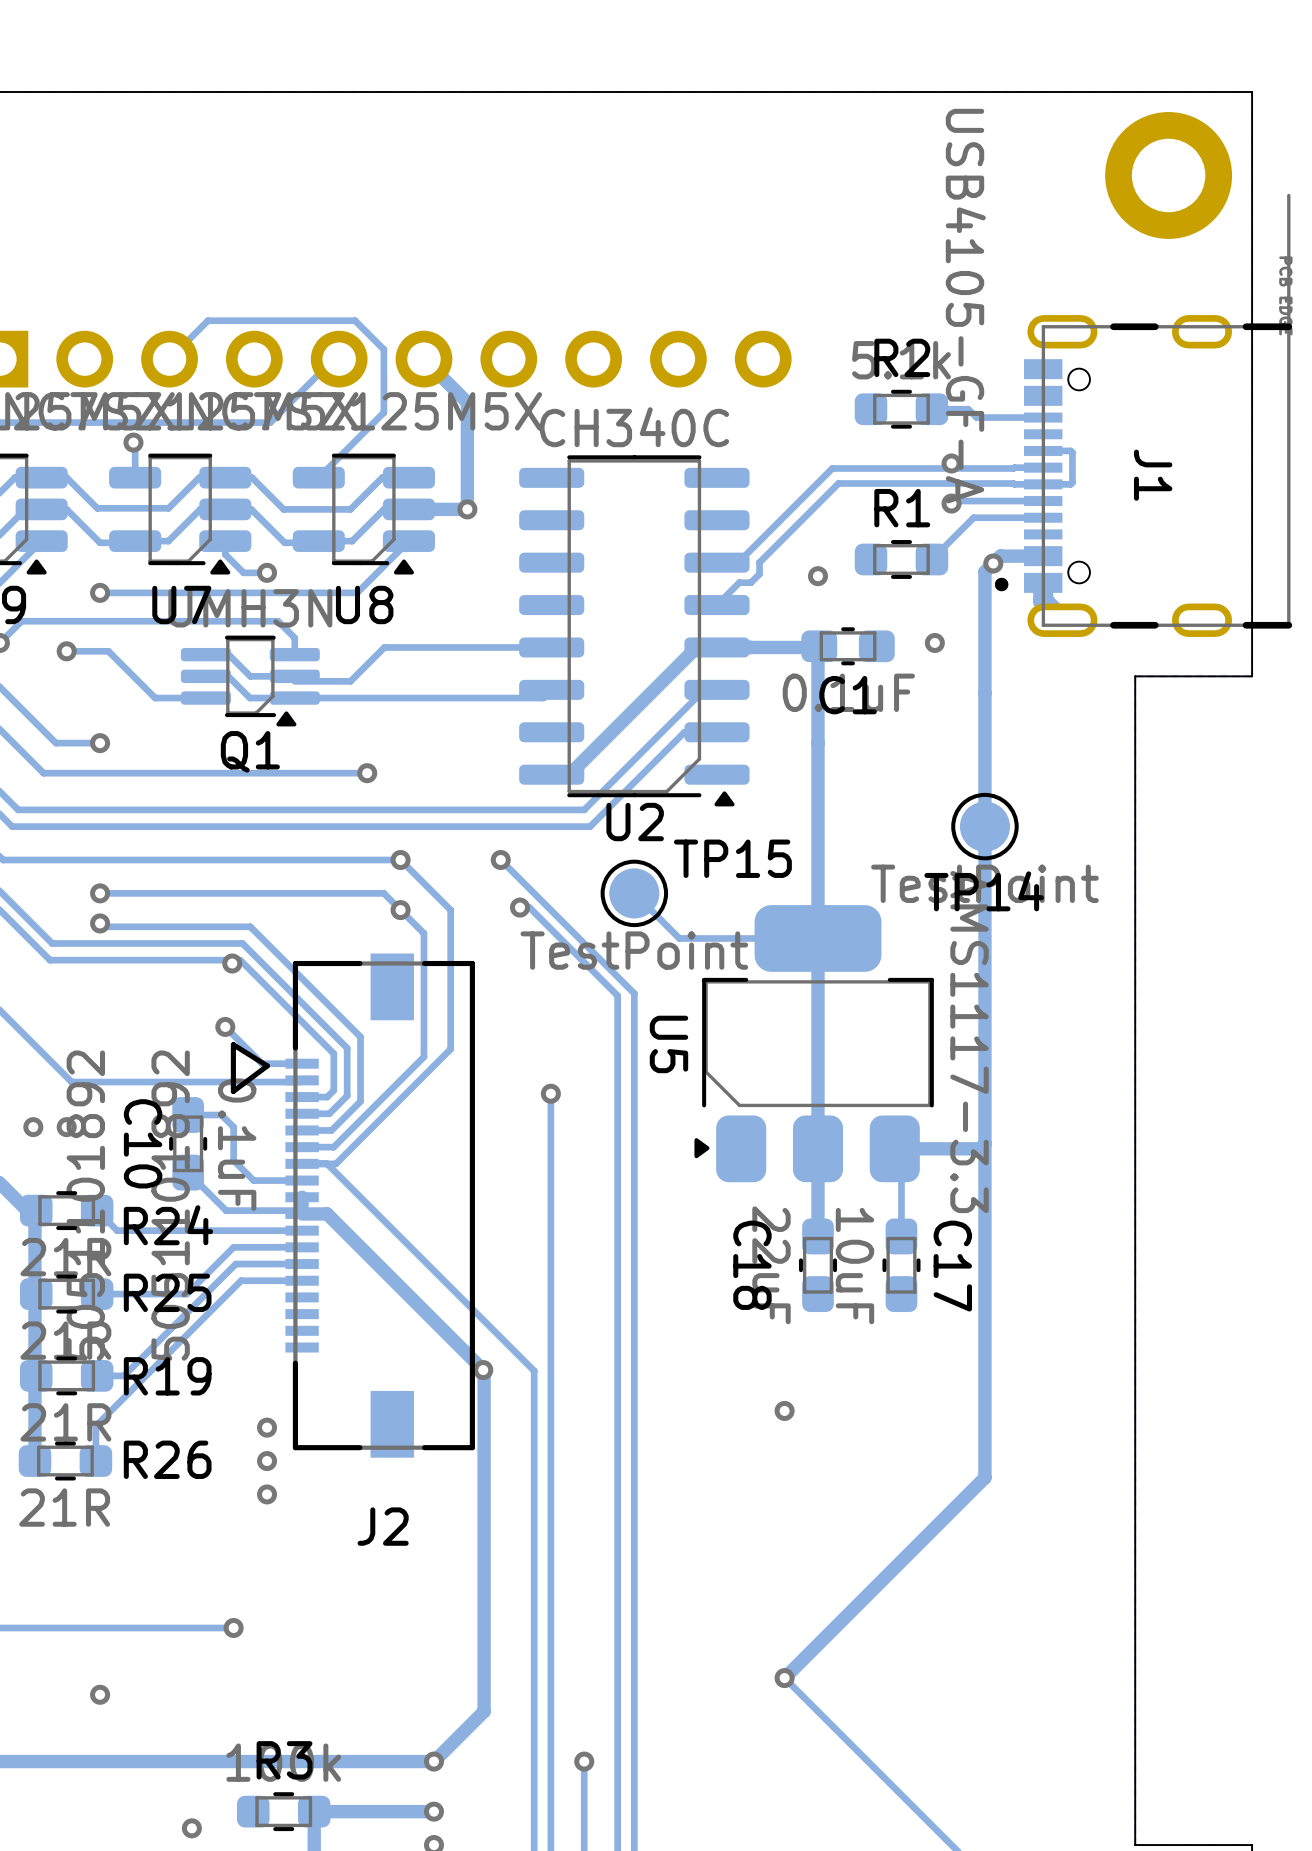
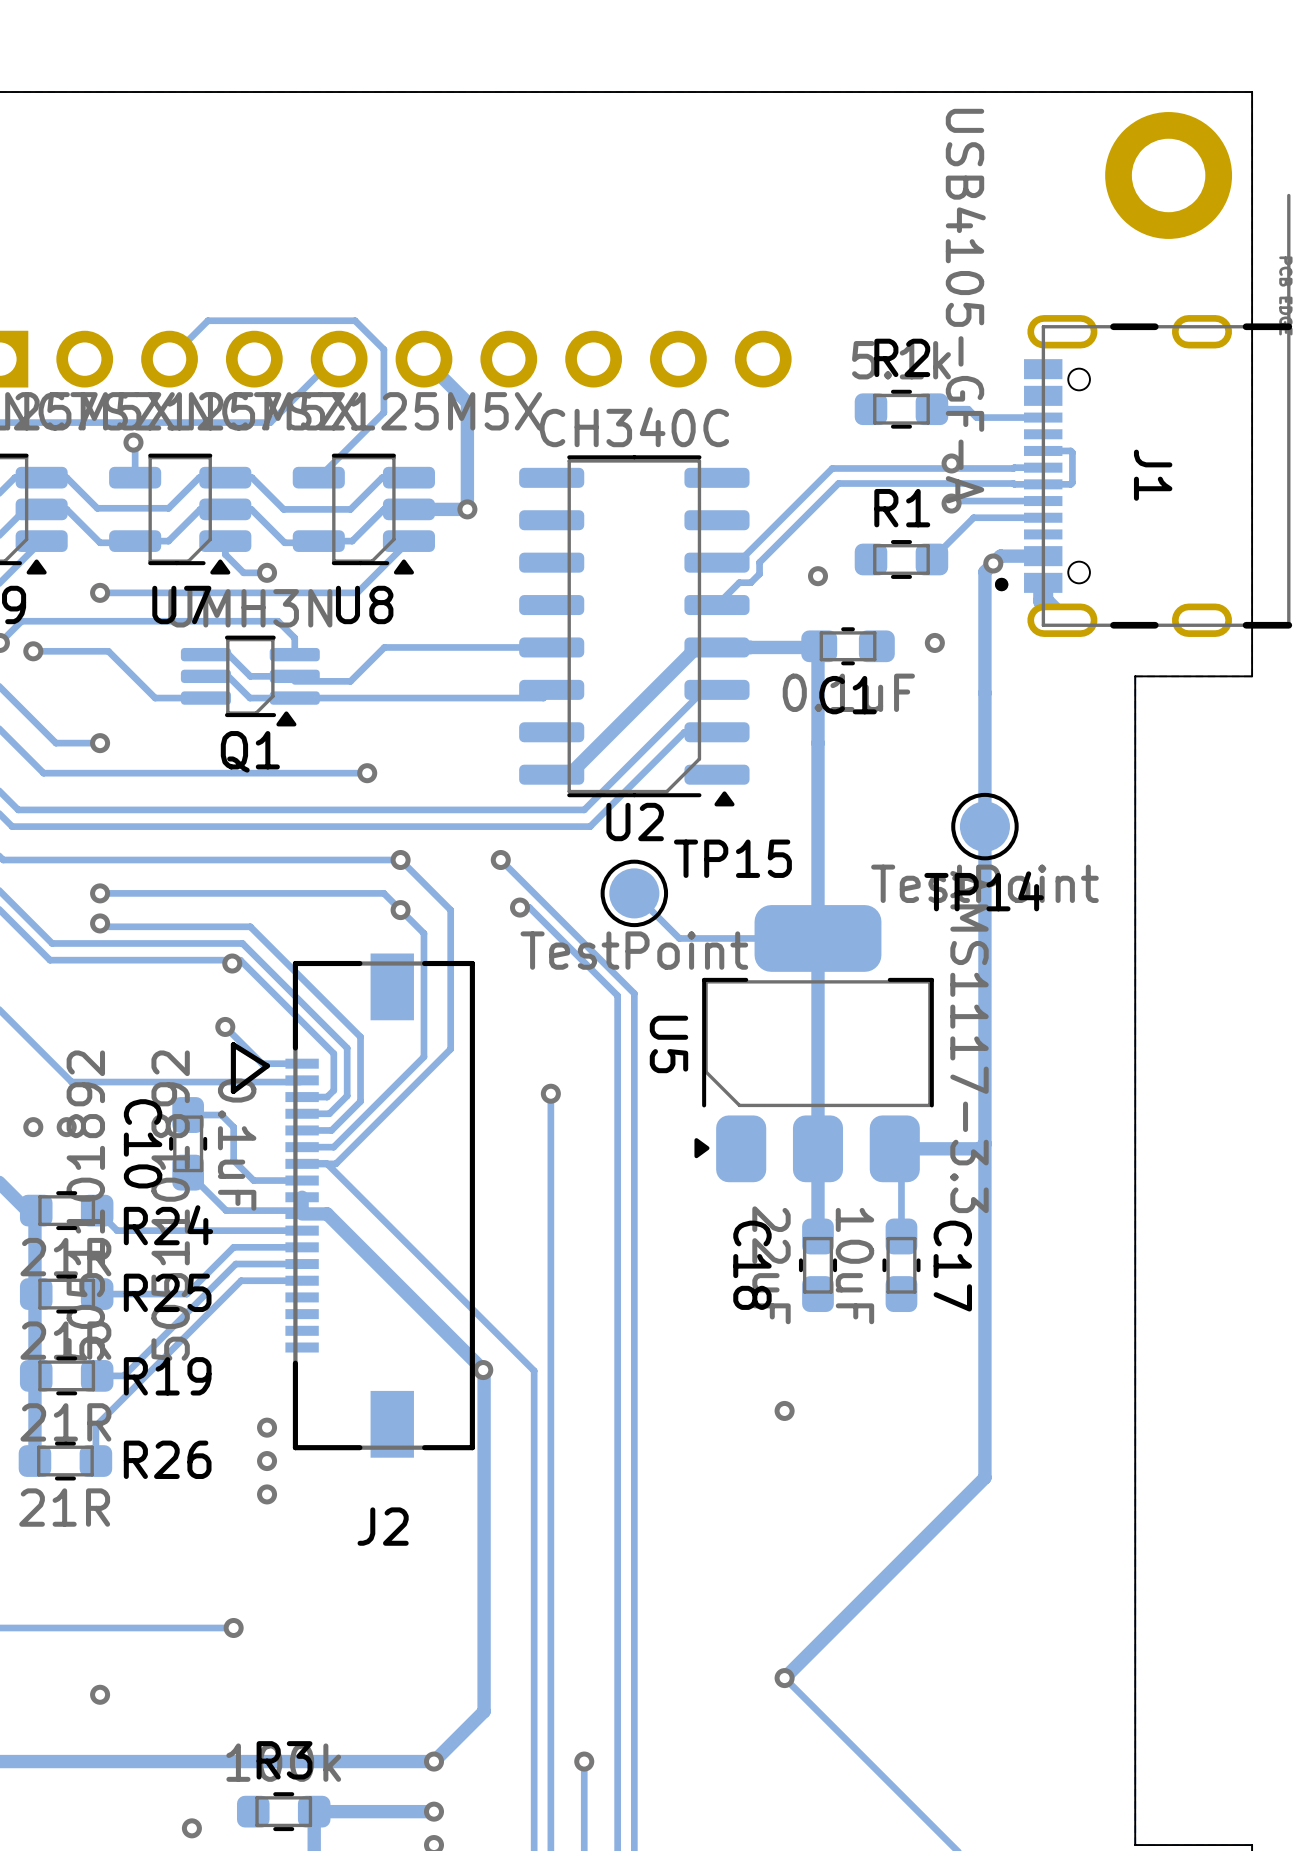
track: none -> (66, 651) (33, 651)
via position: (66, 651) -> (33, 651)

